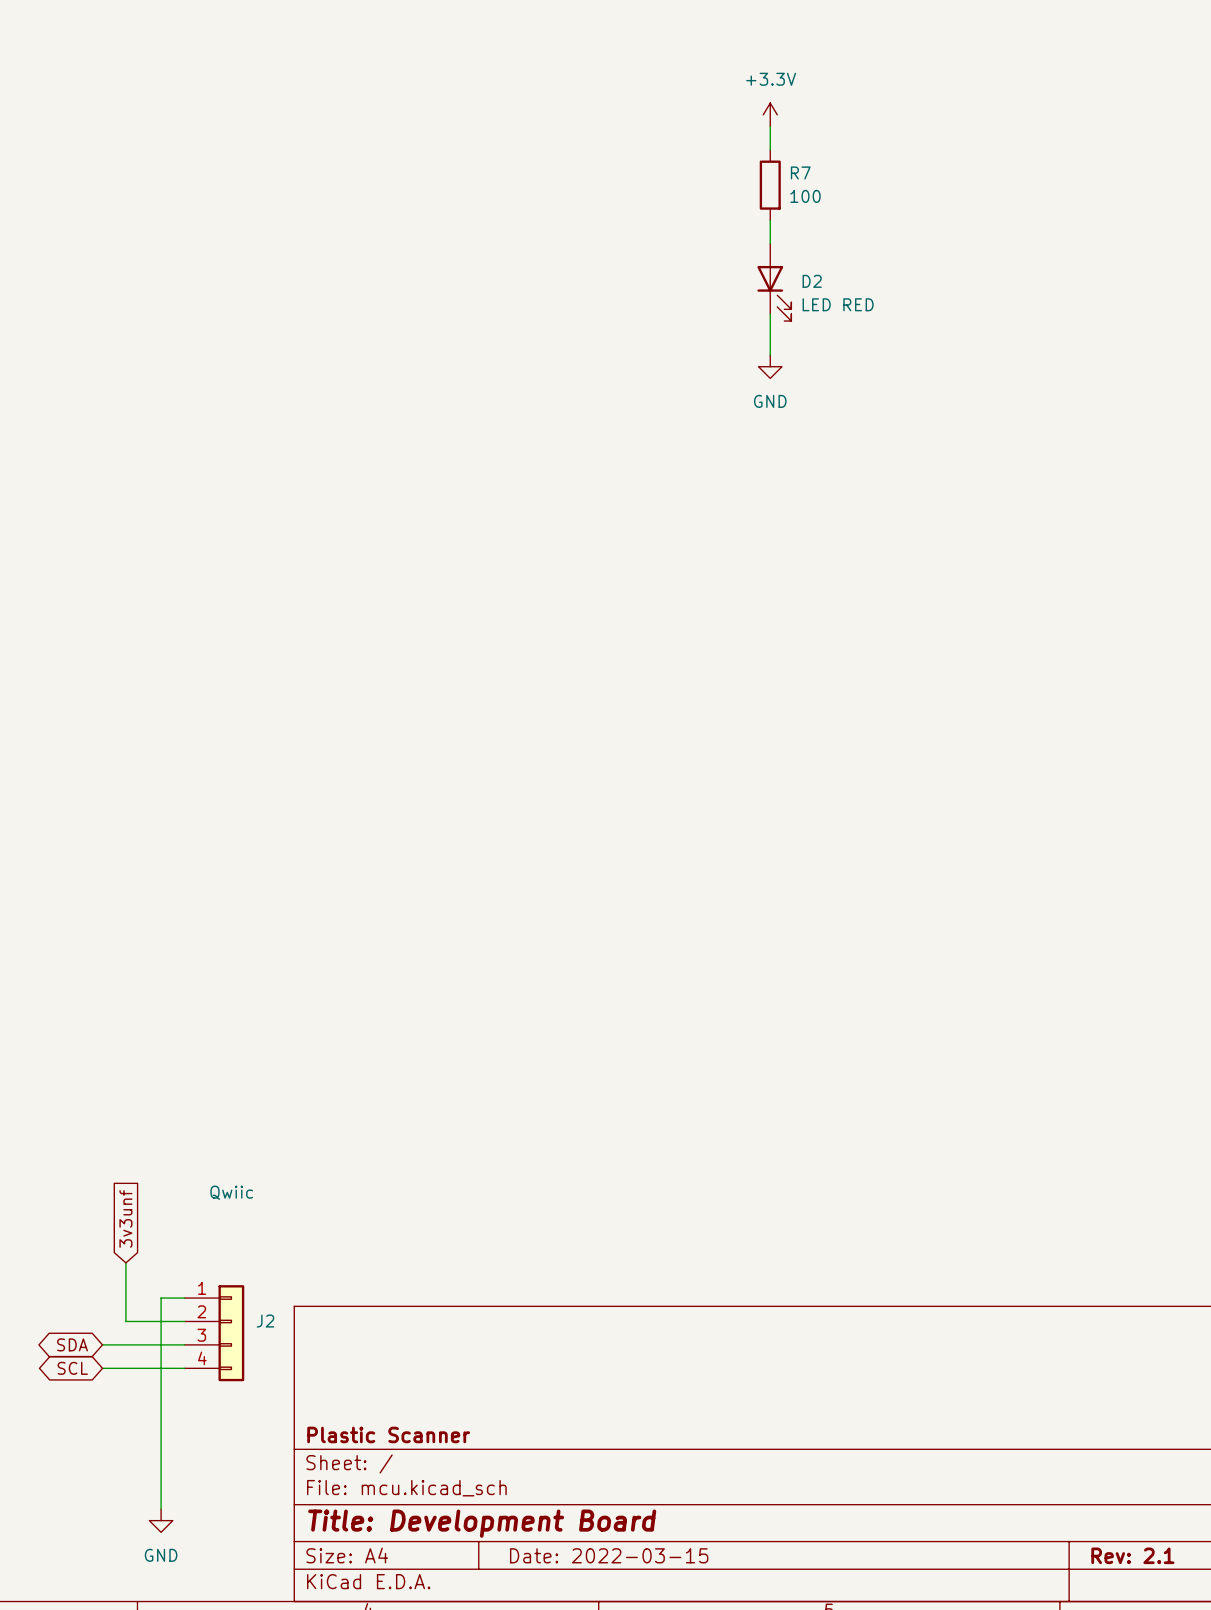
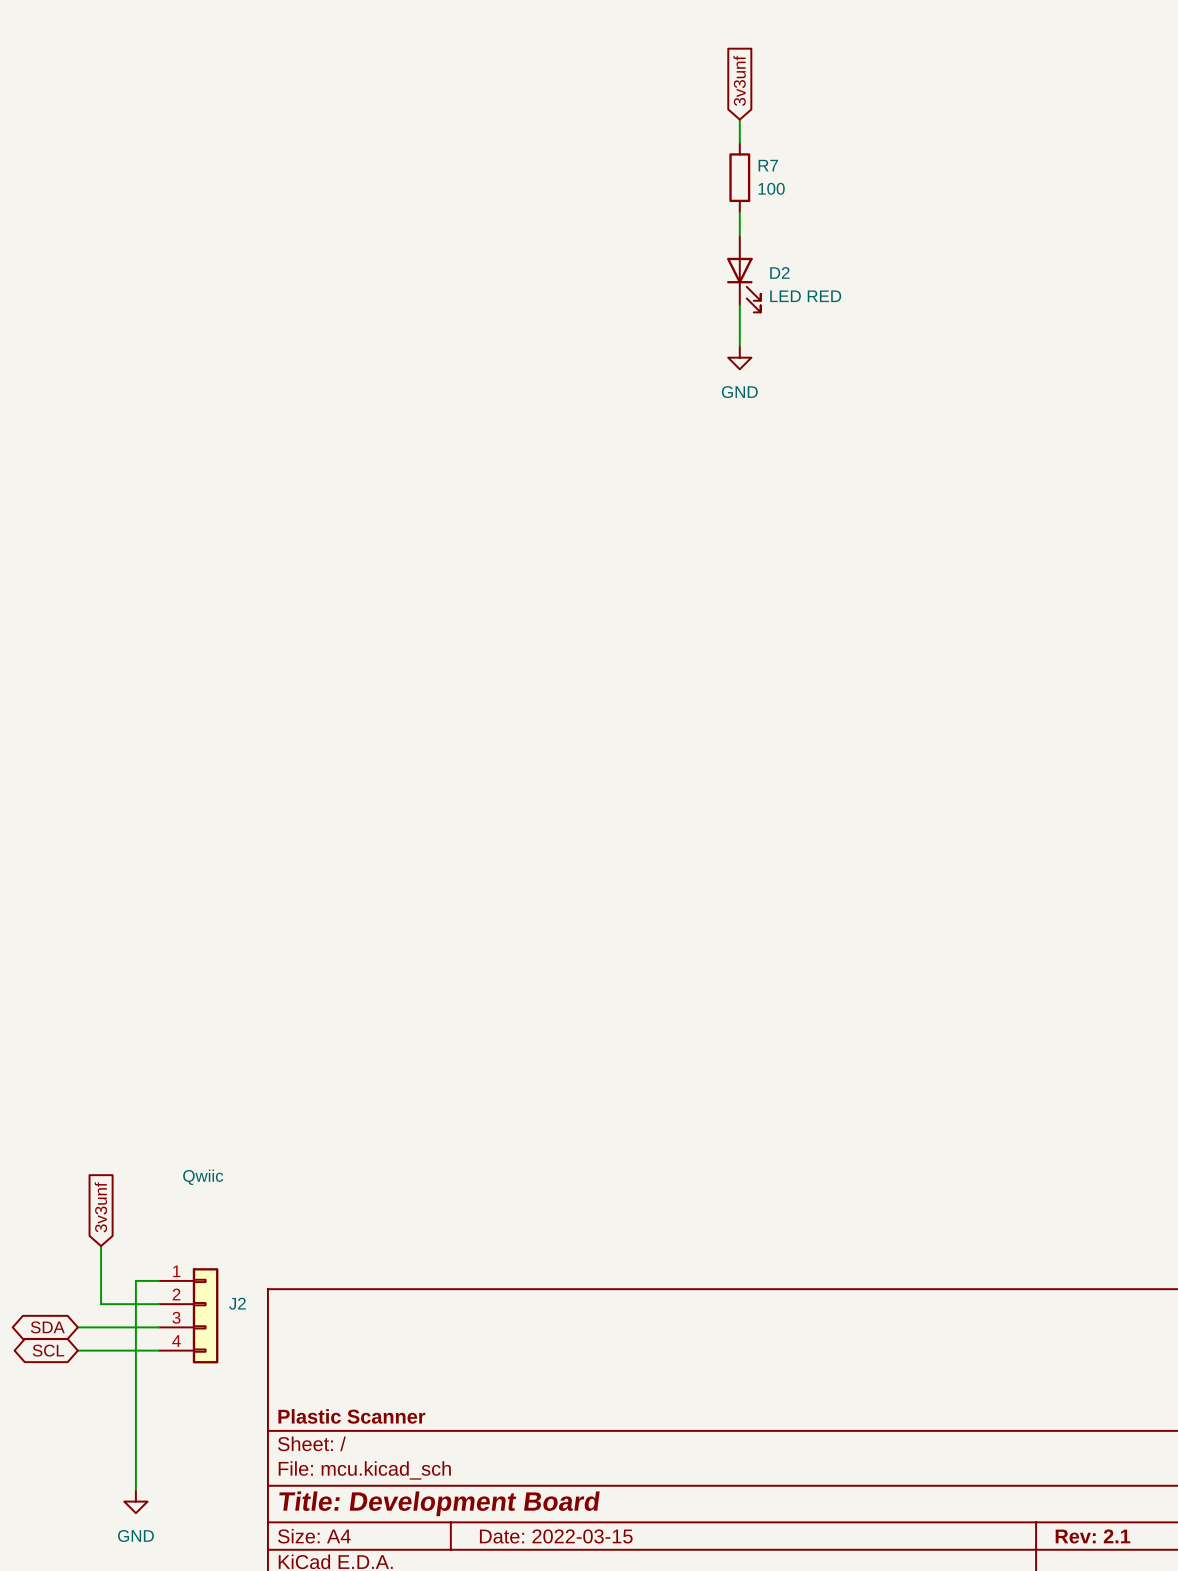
global label: none -> 3v3unf (739, 80)
power symbol: +3.3V (770, 114) -> none

